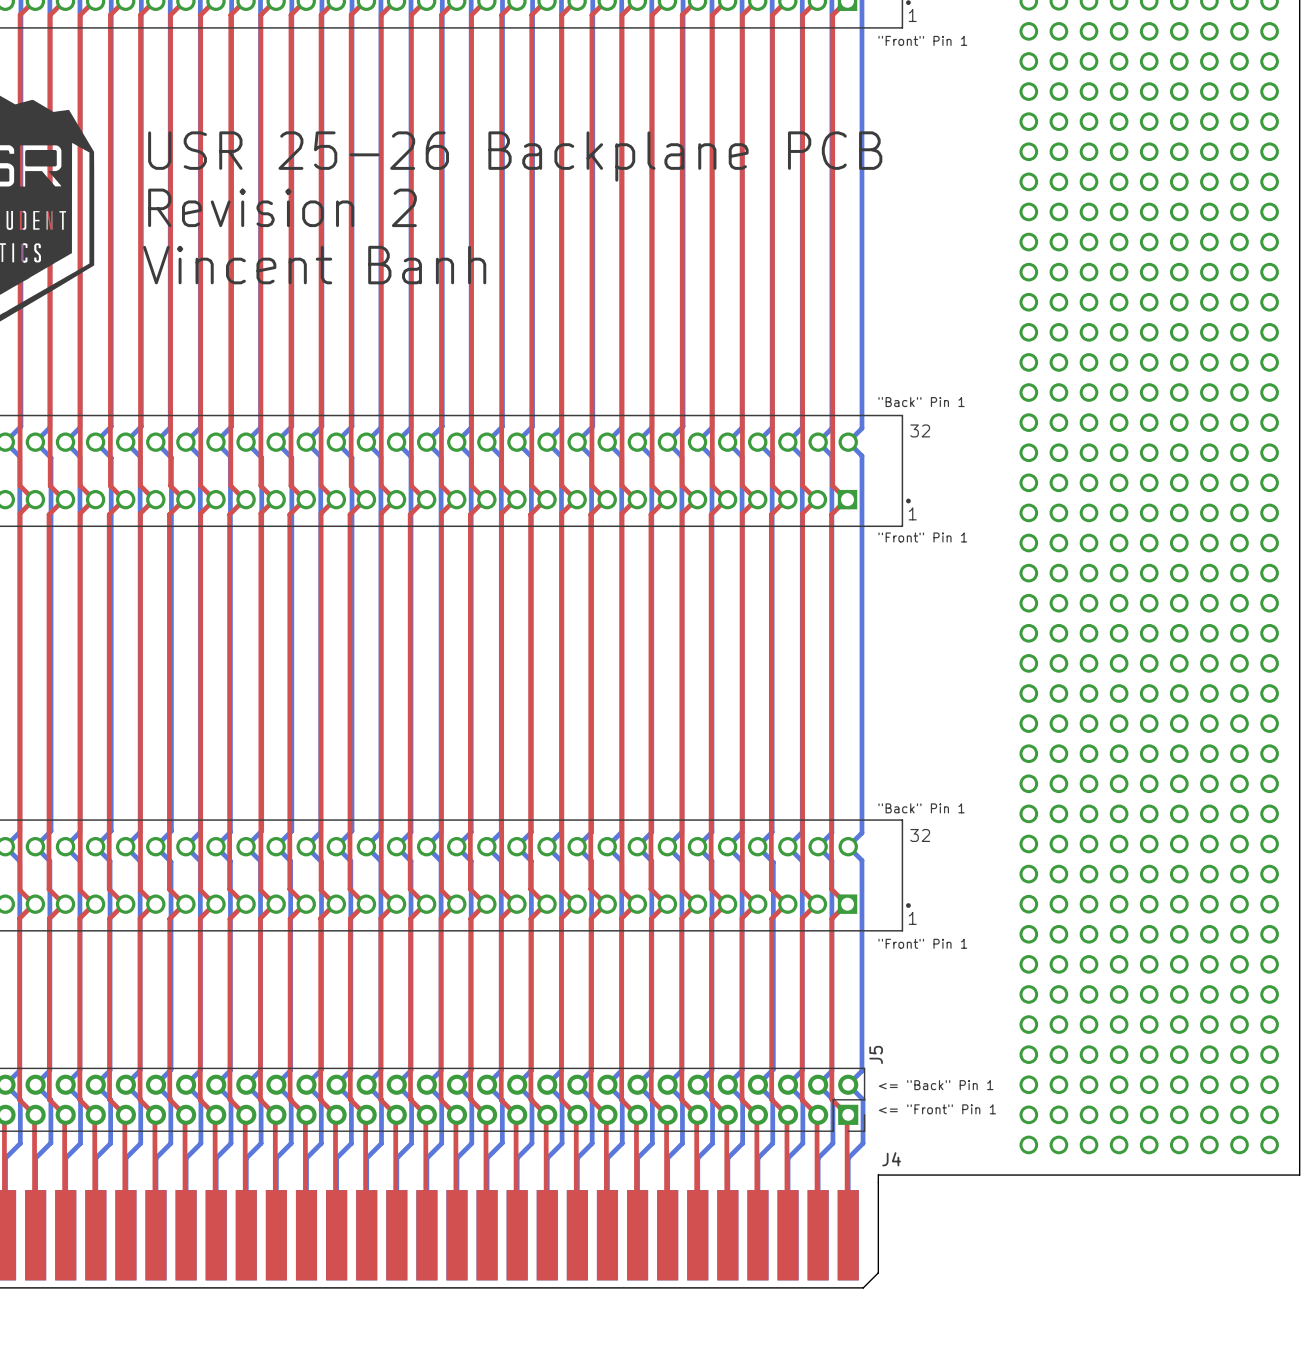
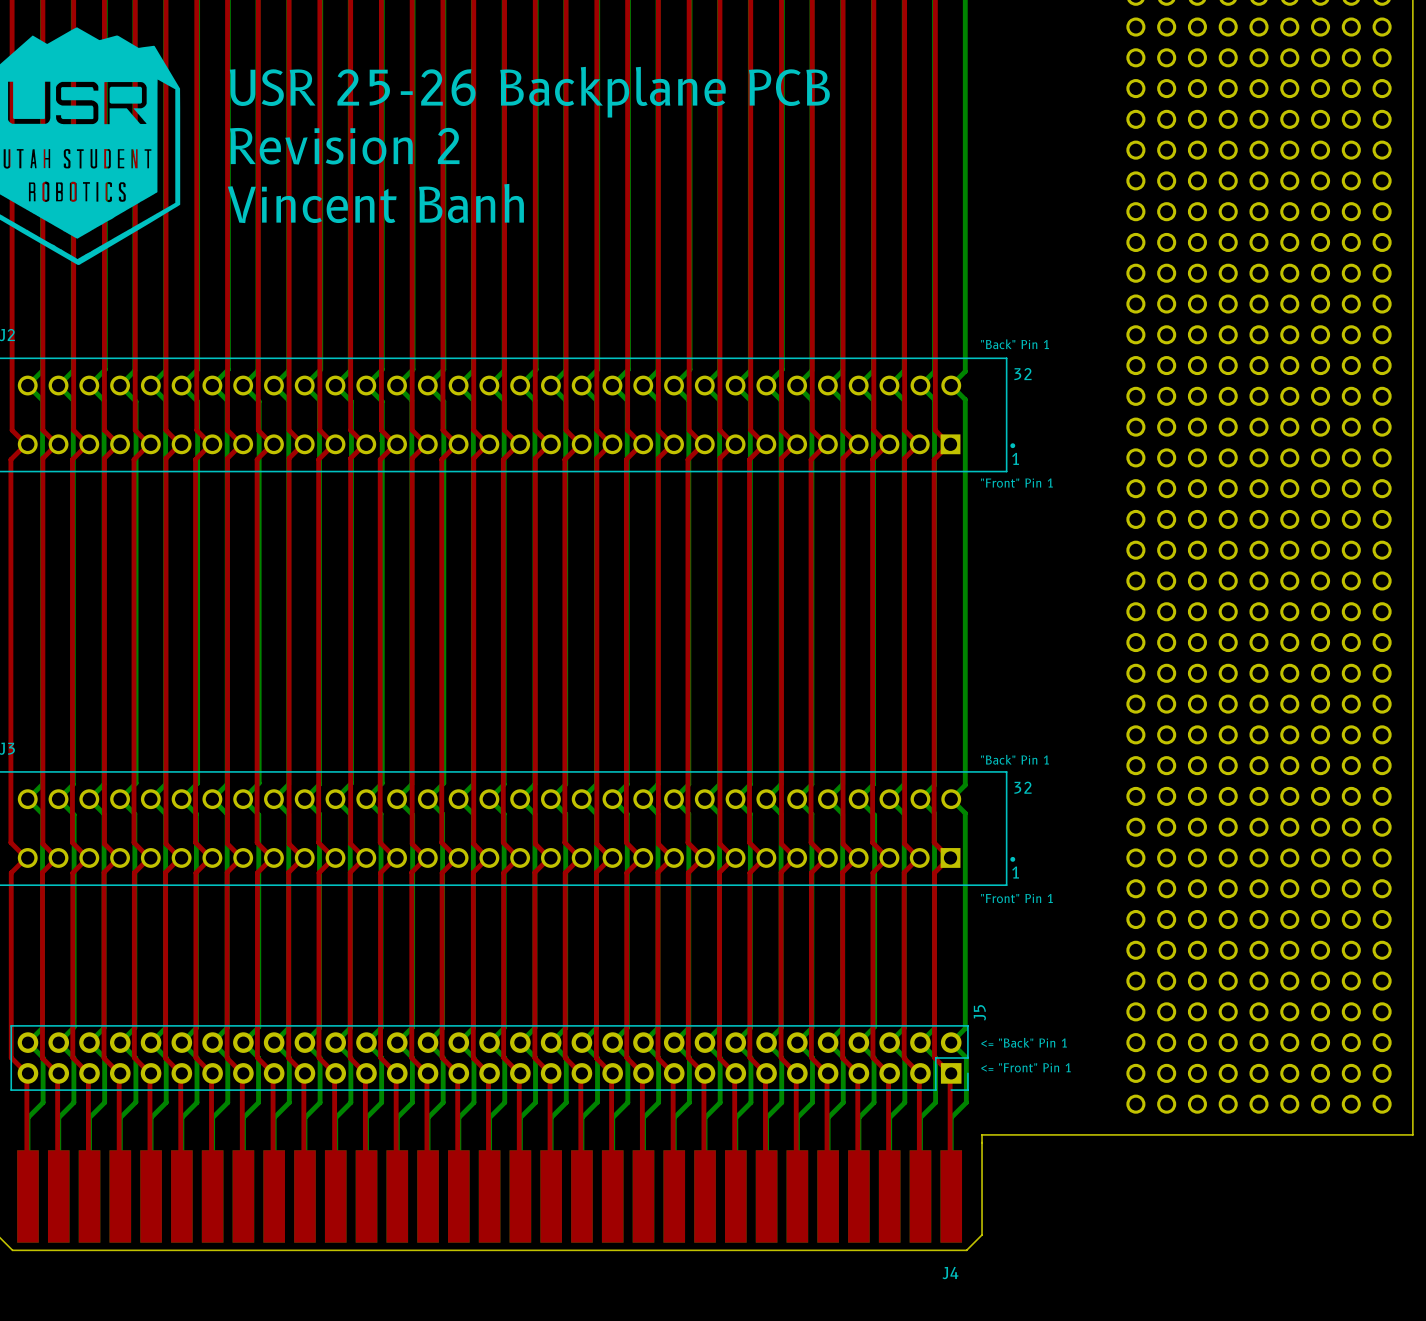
J4 name position: J4 (891, 1159) -> J4 (950, 1273)

